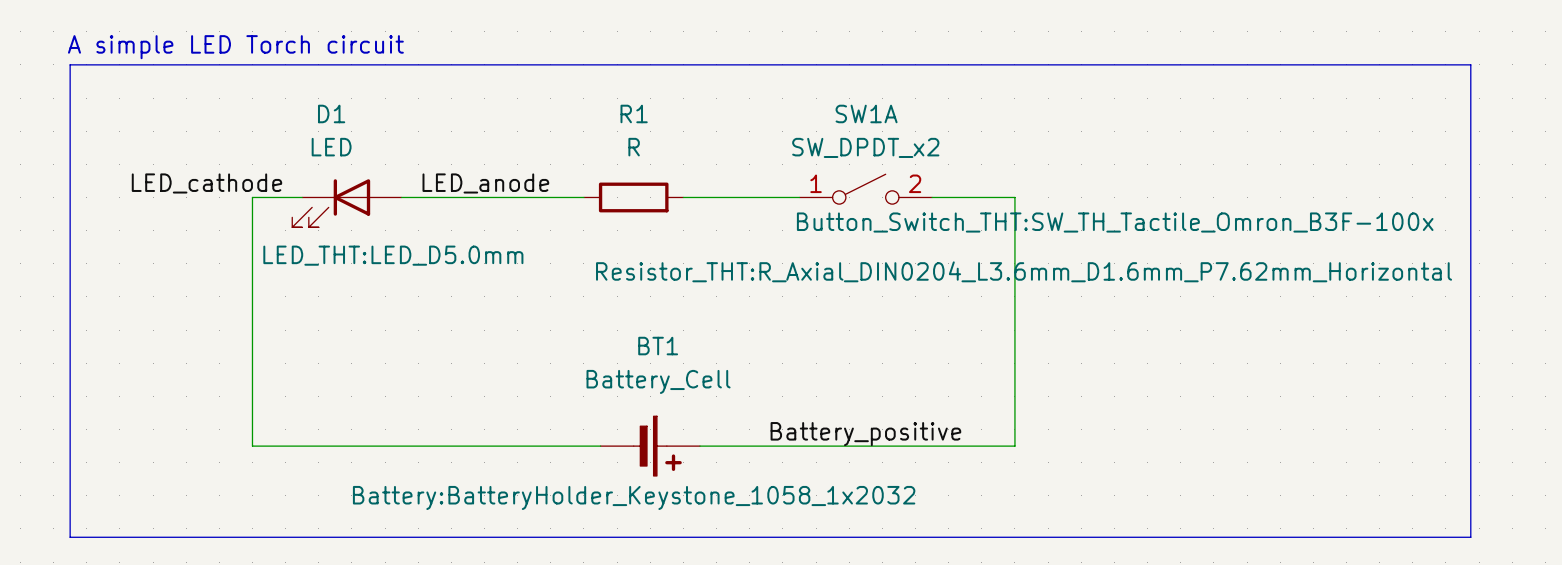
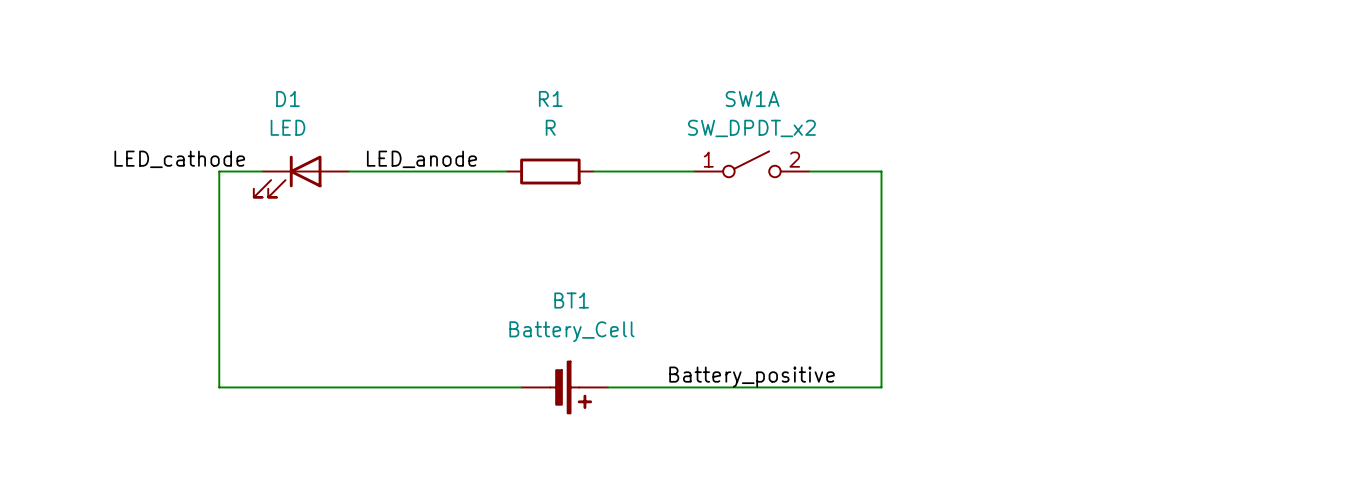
text: A simple LED Torch circuit (235, 47) -> none
line: (70, 64) (1470, 64) (1470, 537) (70, 537) (70, 64) -> none
SW1A text: Button_Switch_THT:SW_TH_Tactile_Omron_B3F-100x (1115, 222) -> none
D1 text: LED_THT:LED_D5.0mm (393, 255) -> none
R1 text: Resistor_THT:R_Axial_DIN0204_L3.6mm_D1.6mm_P7.62mm_Horizontal (1024, 271) -> none
BT1 text: Battery:BatteryHolder_Keystone_1058_1x2032 (634, 497) -> none

